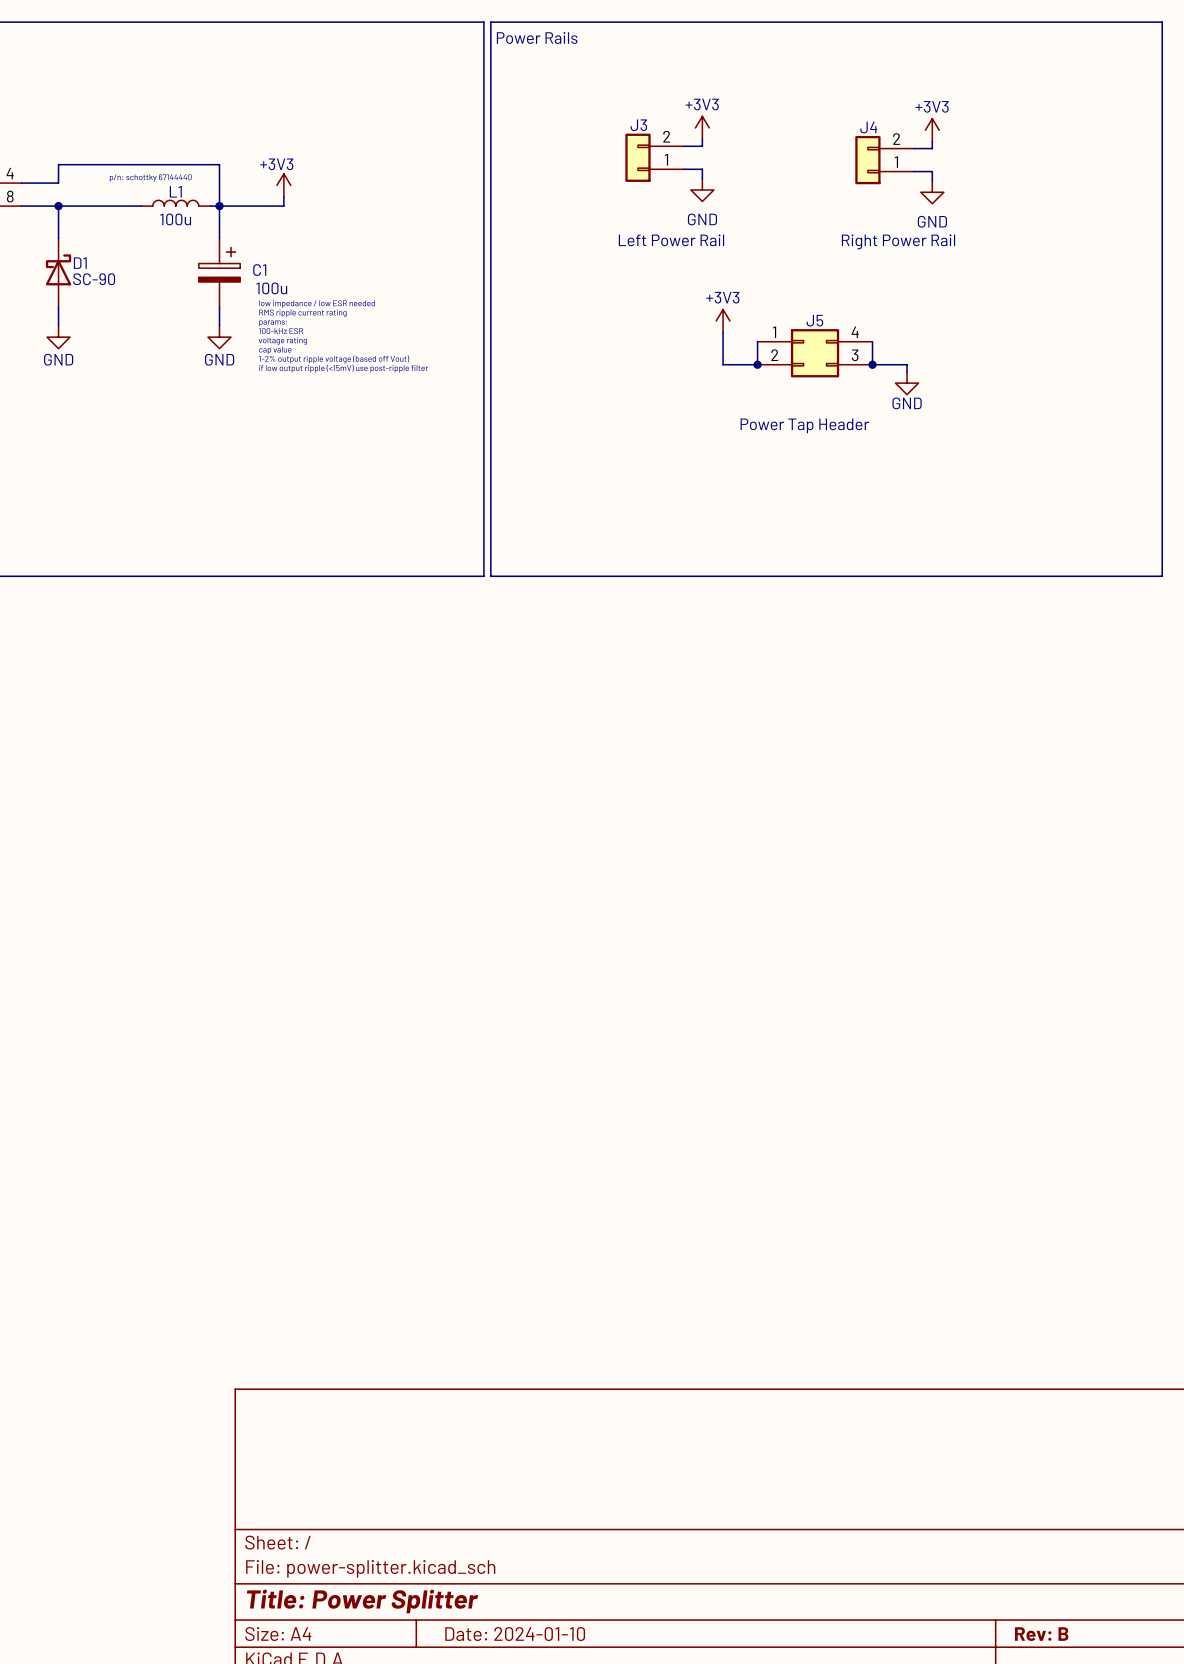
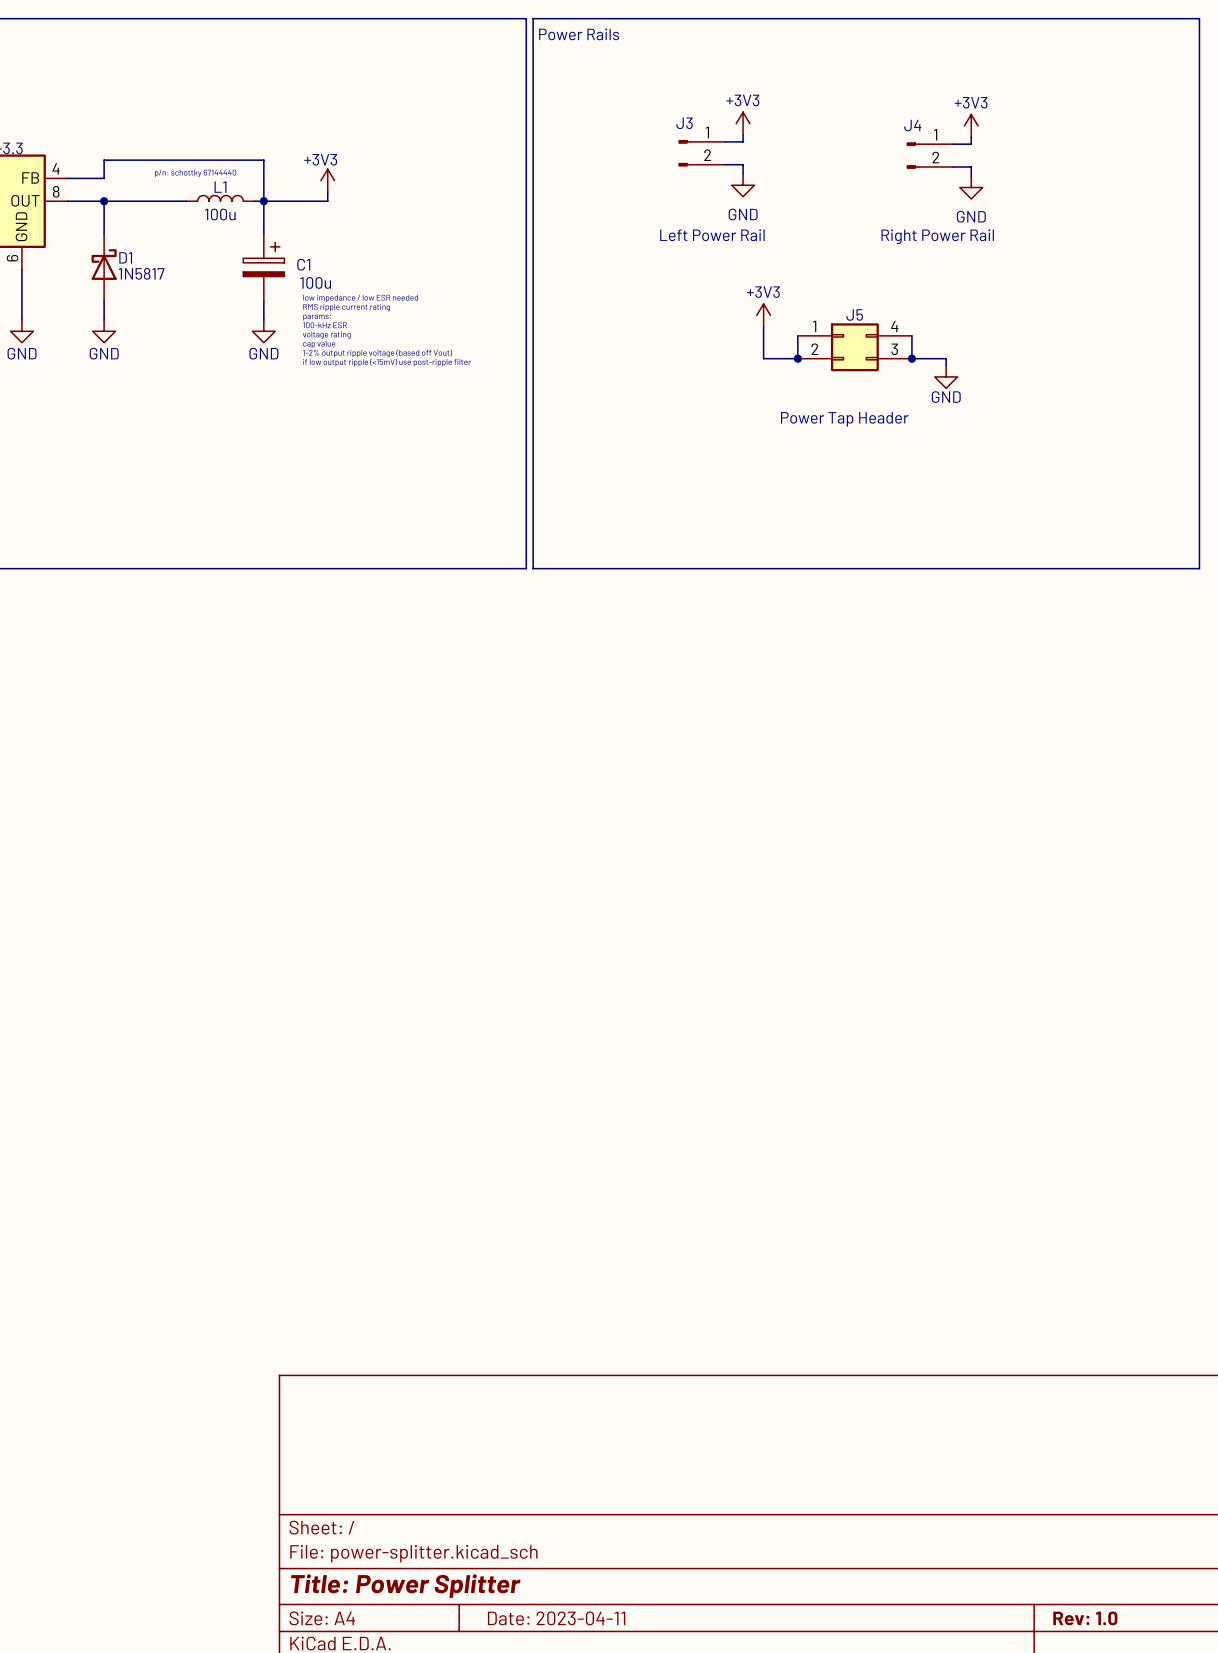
J3 symbol: [625, 133, 684, 182] -> [678, 140, 725, 167]
J4 symbol: [855, 135, 914, 185] -> [906, 142, 954, 169]
D1 value: SC-90 (94, 279) -> 1N5817 (141, 273)
title block: Date: 2024-01-10 (515, 1634) -> Date: 2023-04-11 (556, 1618)
title block: Rev: B (1041, 1634) -> Rev: 1.0 (1085, 1618)

